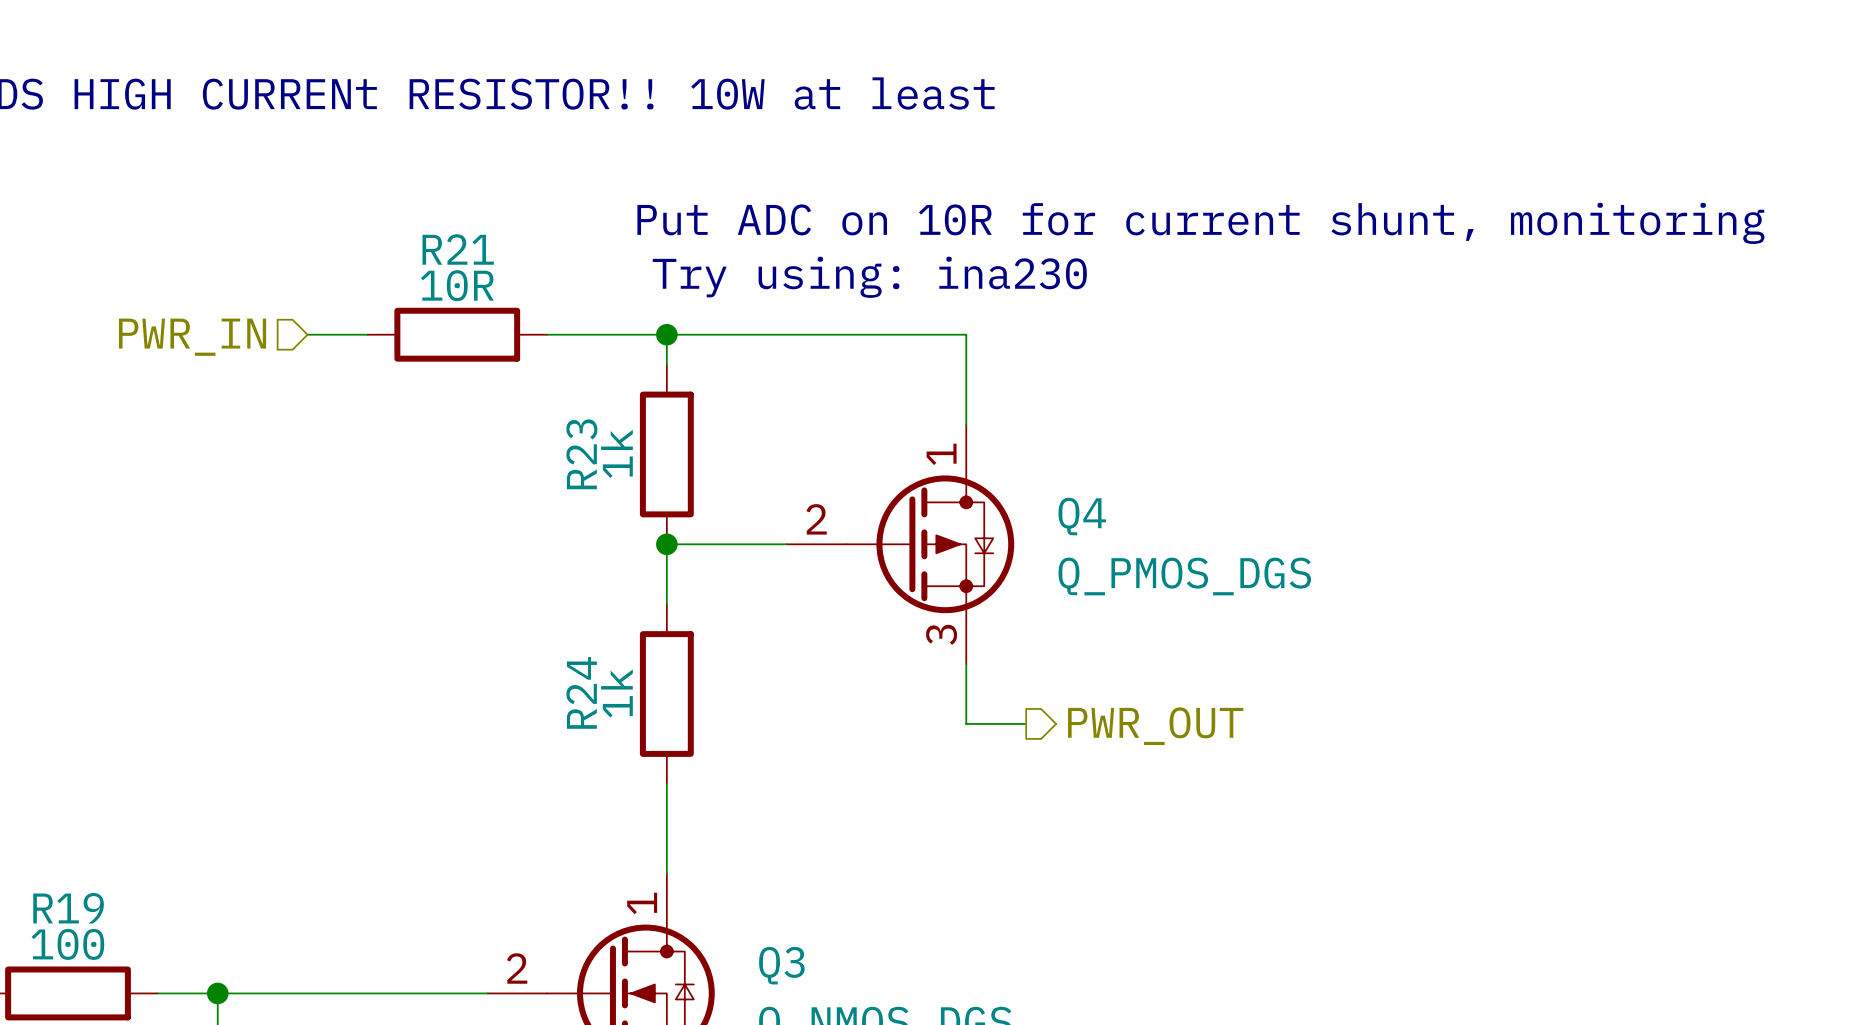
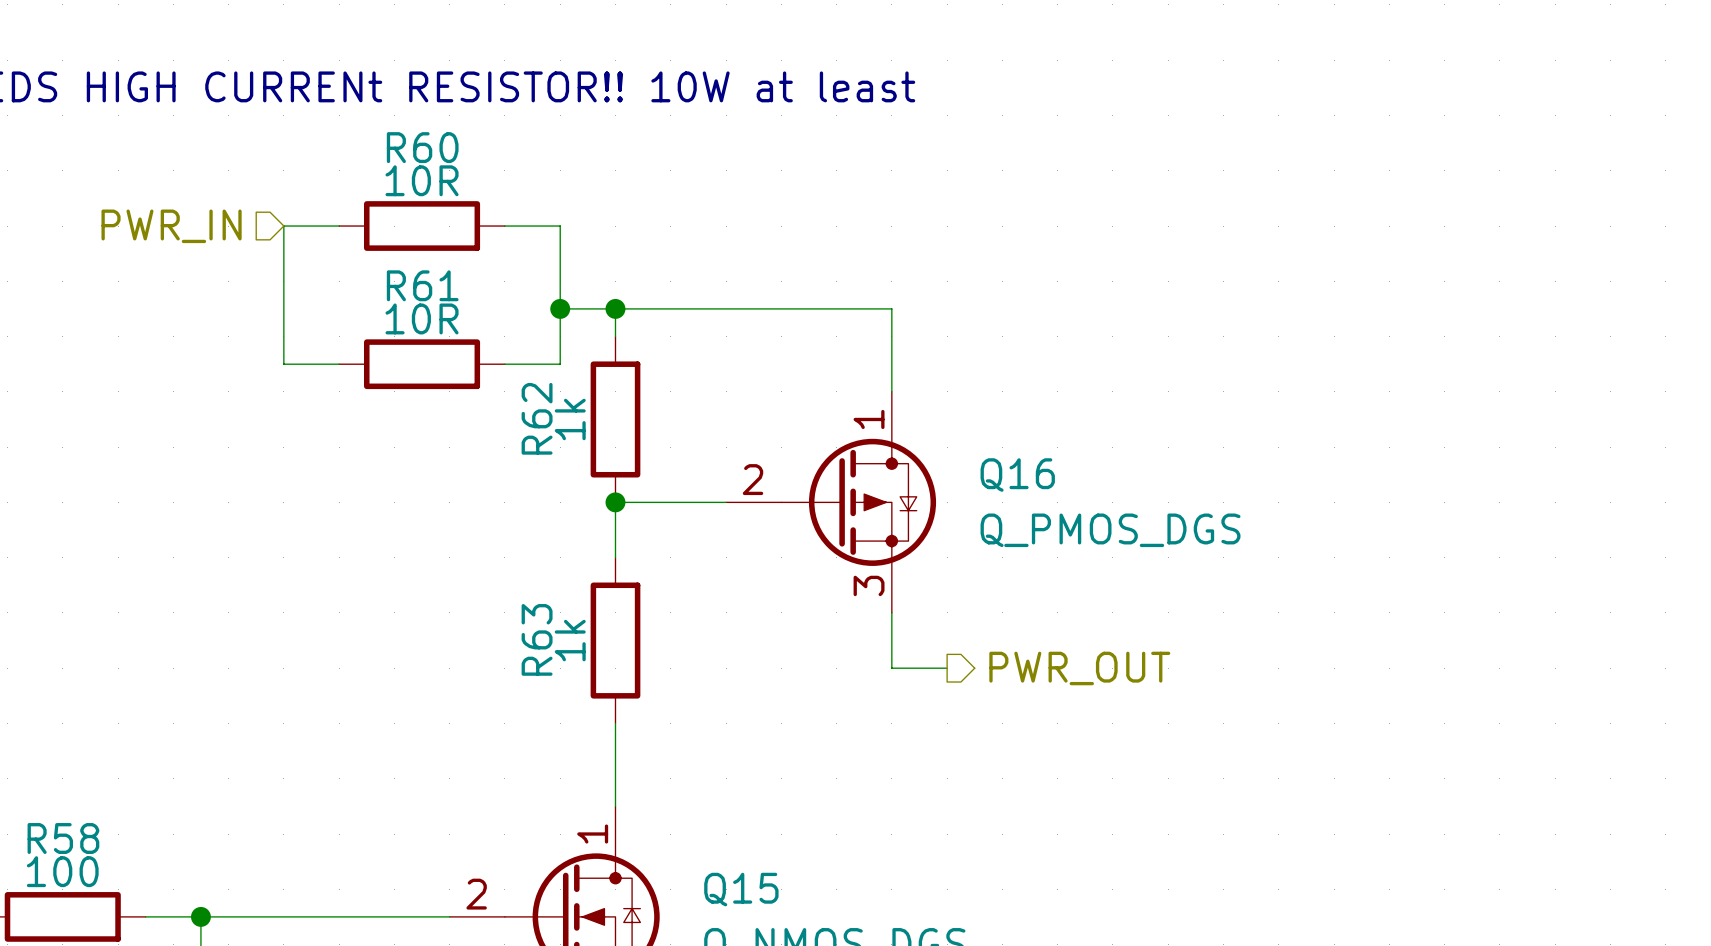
text: Put ADC on 10R for current shunt, monitoring (1200, 223) -> none
wire: none -> (339, 226) (283, 226) (283, 364) (339, 364)
R60: none -> 10R (422, 226)
wire: none -> (504, 226) (560, 226) (560, 364) (504, 364)
text: Try using: ina230 (869, 277) -> none
wire: (307, 334) (367, 334) -> none
R21: 10R (457, 334) -> none
wire: (547, 334) (606, 334) -> none
junction: none -> (560, 308)
hierarchical label position: PWR_IN (192, 337) -> PWR_IN (171, 226)
R61: none -> 10R (422, 364)
R23 name: R23 (581, 454) -> R62 (537, 418)
Q4 name: Q4 (1082, 516) -> Q16 (1017, 475)
R24 name: R24 (581, 692) -> R63 (537, 639)
R19 name: R19 (68, 908) -> R58 (63, 838)
Q3 name: Q3 (781, 965) -> Q15 (741, 889)

